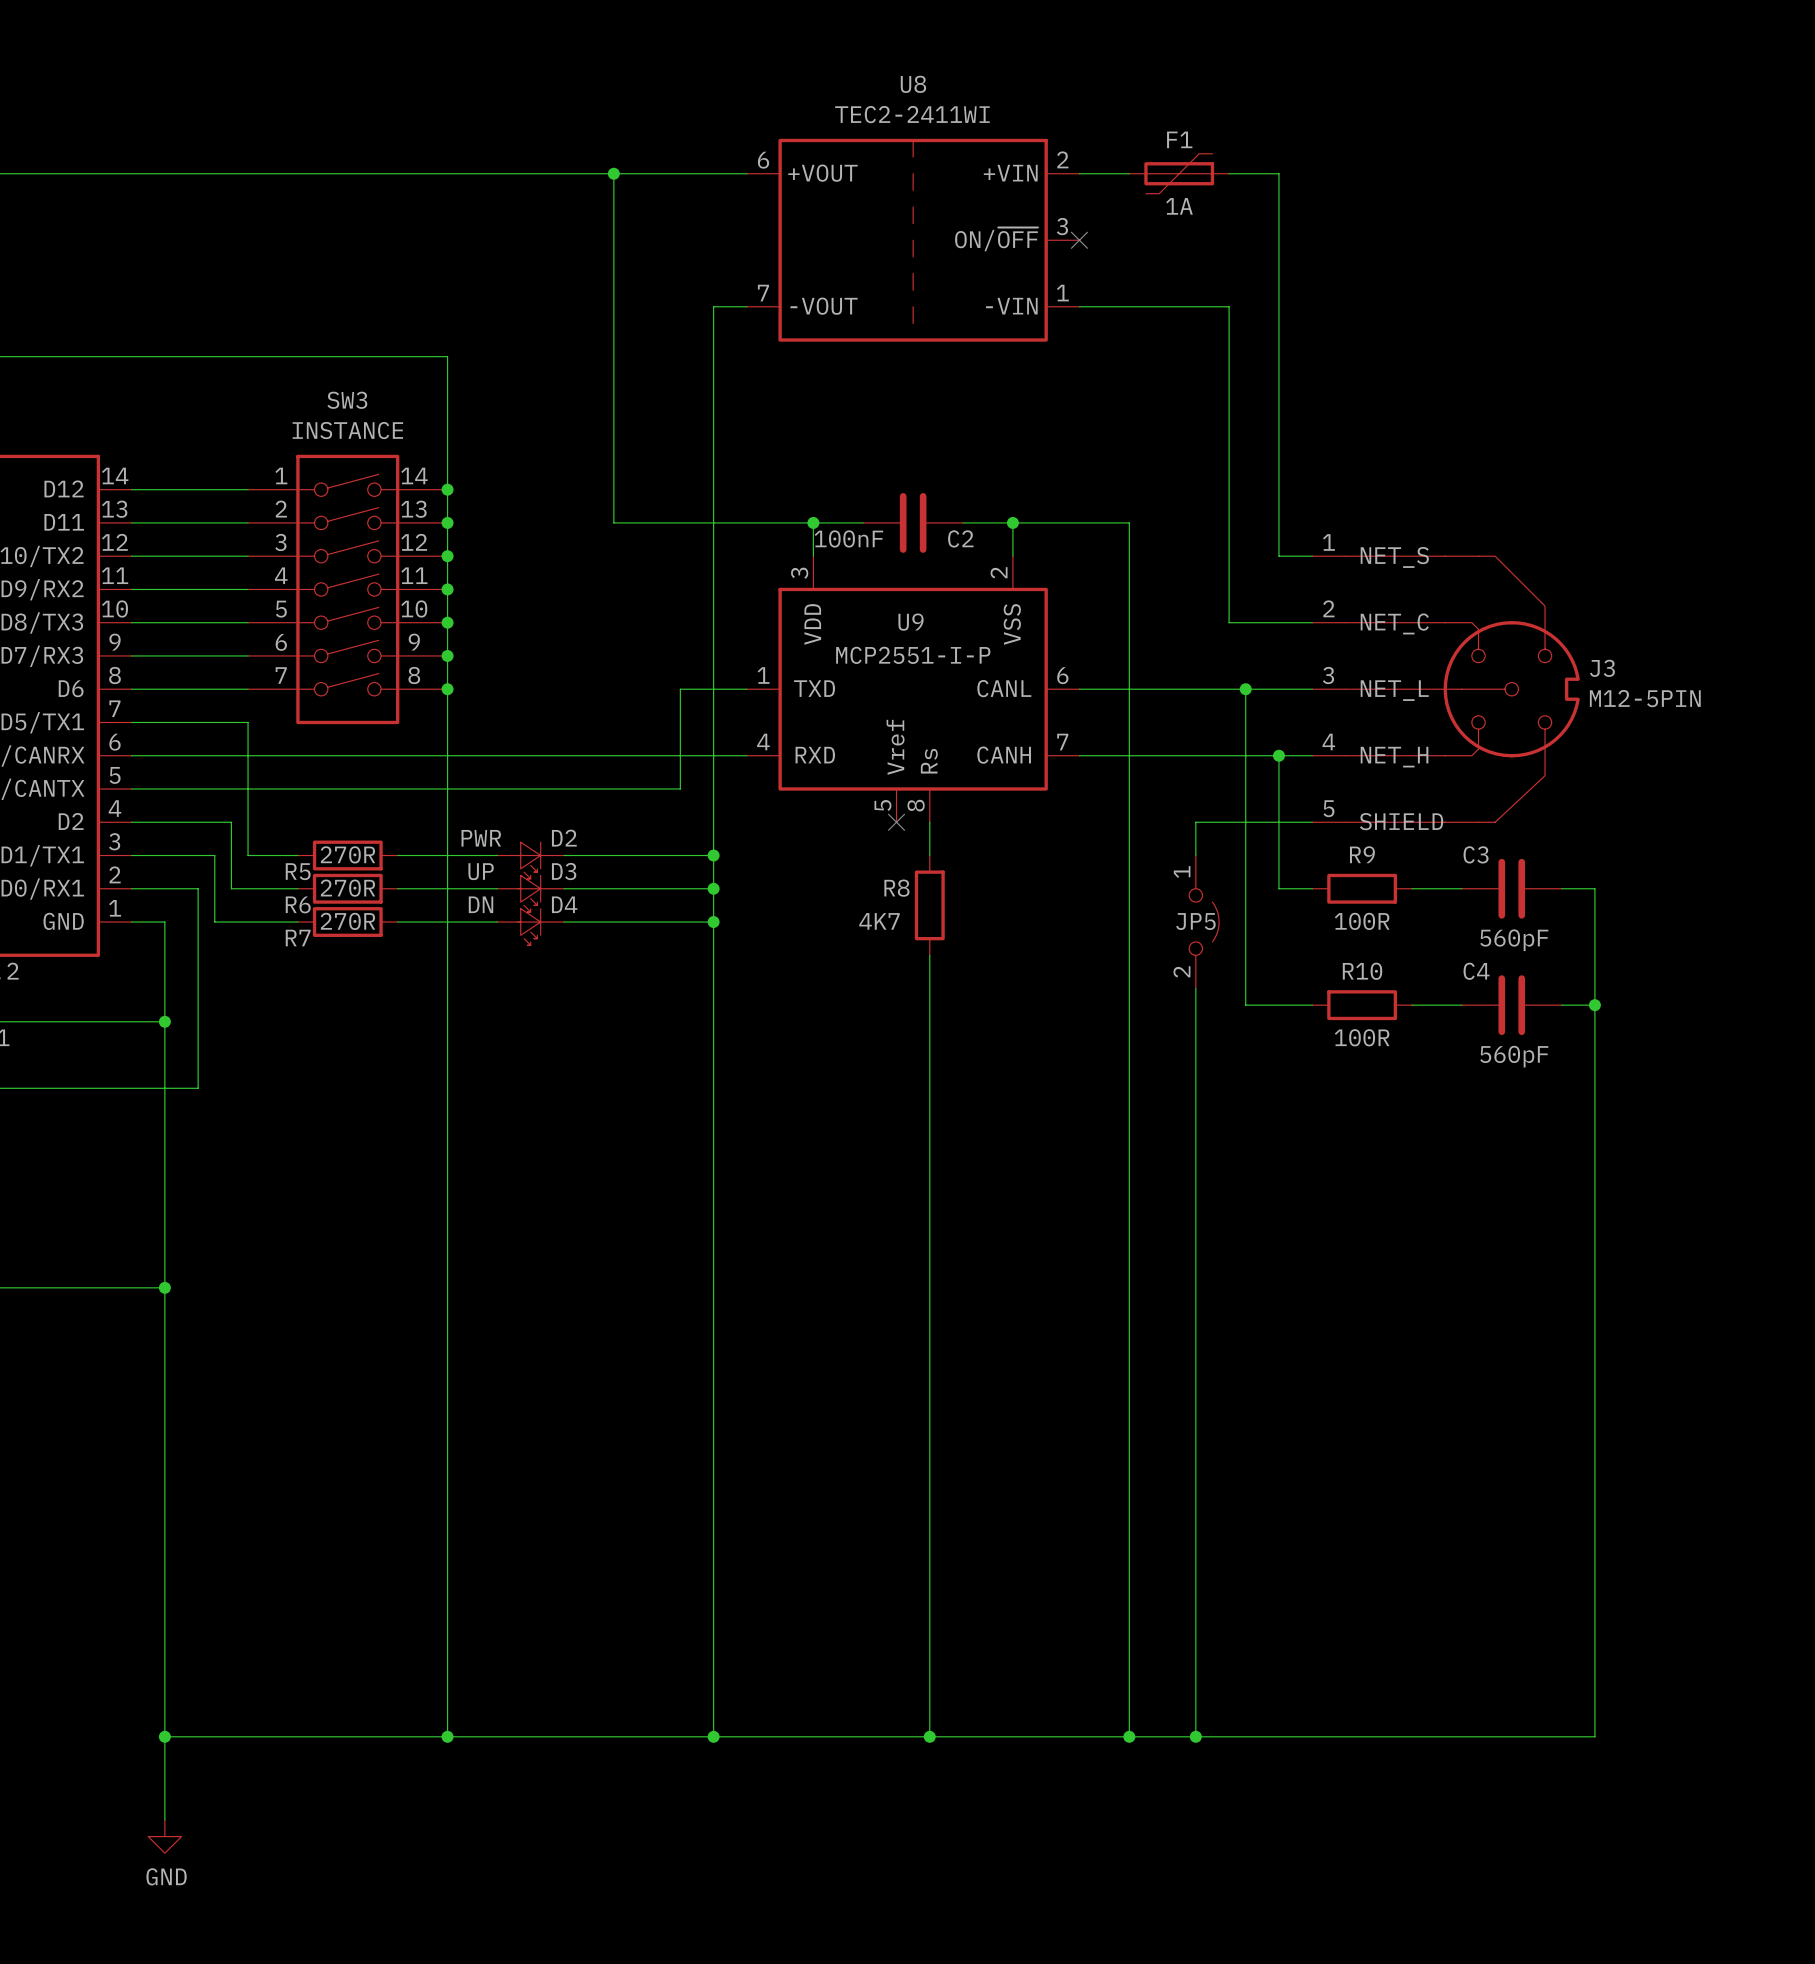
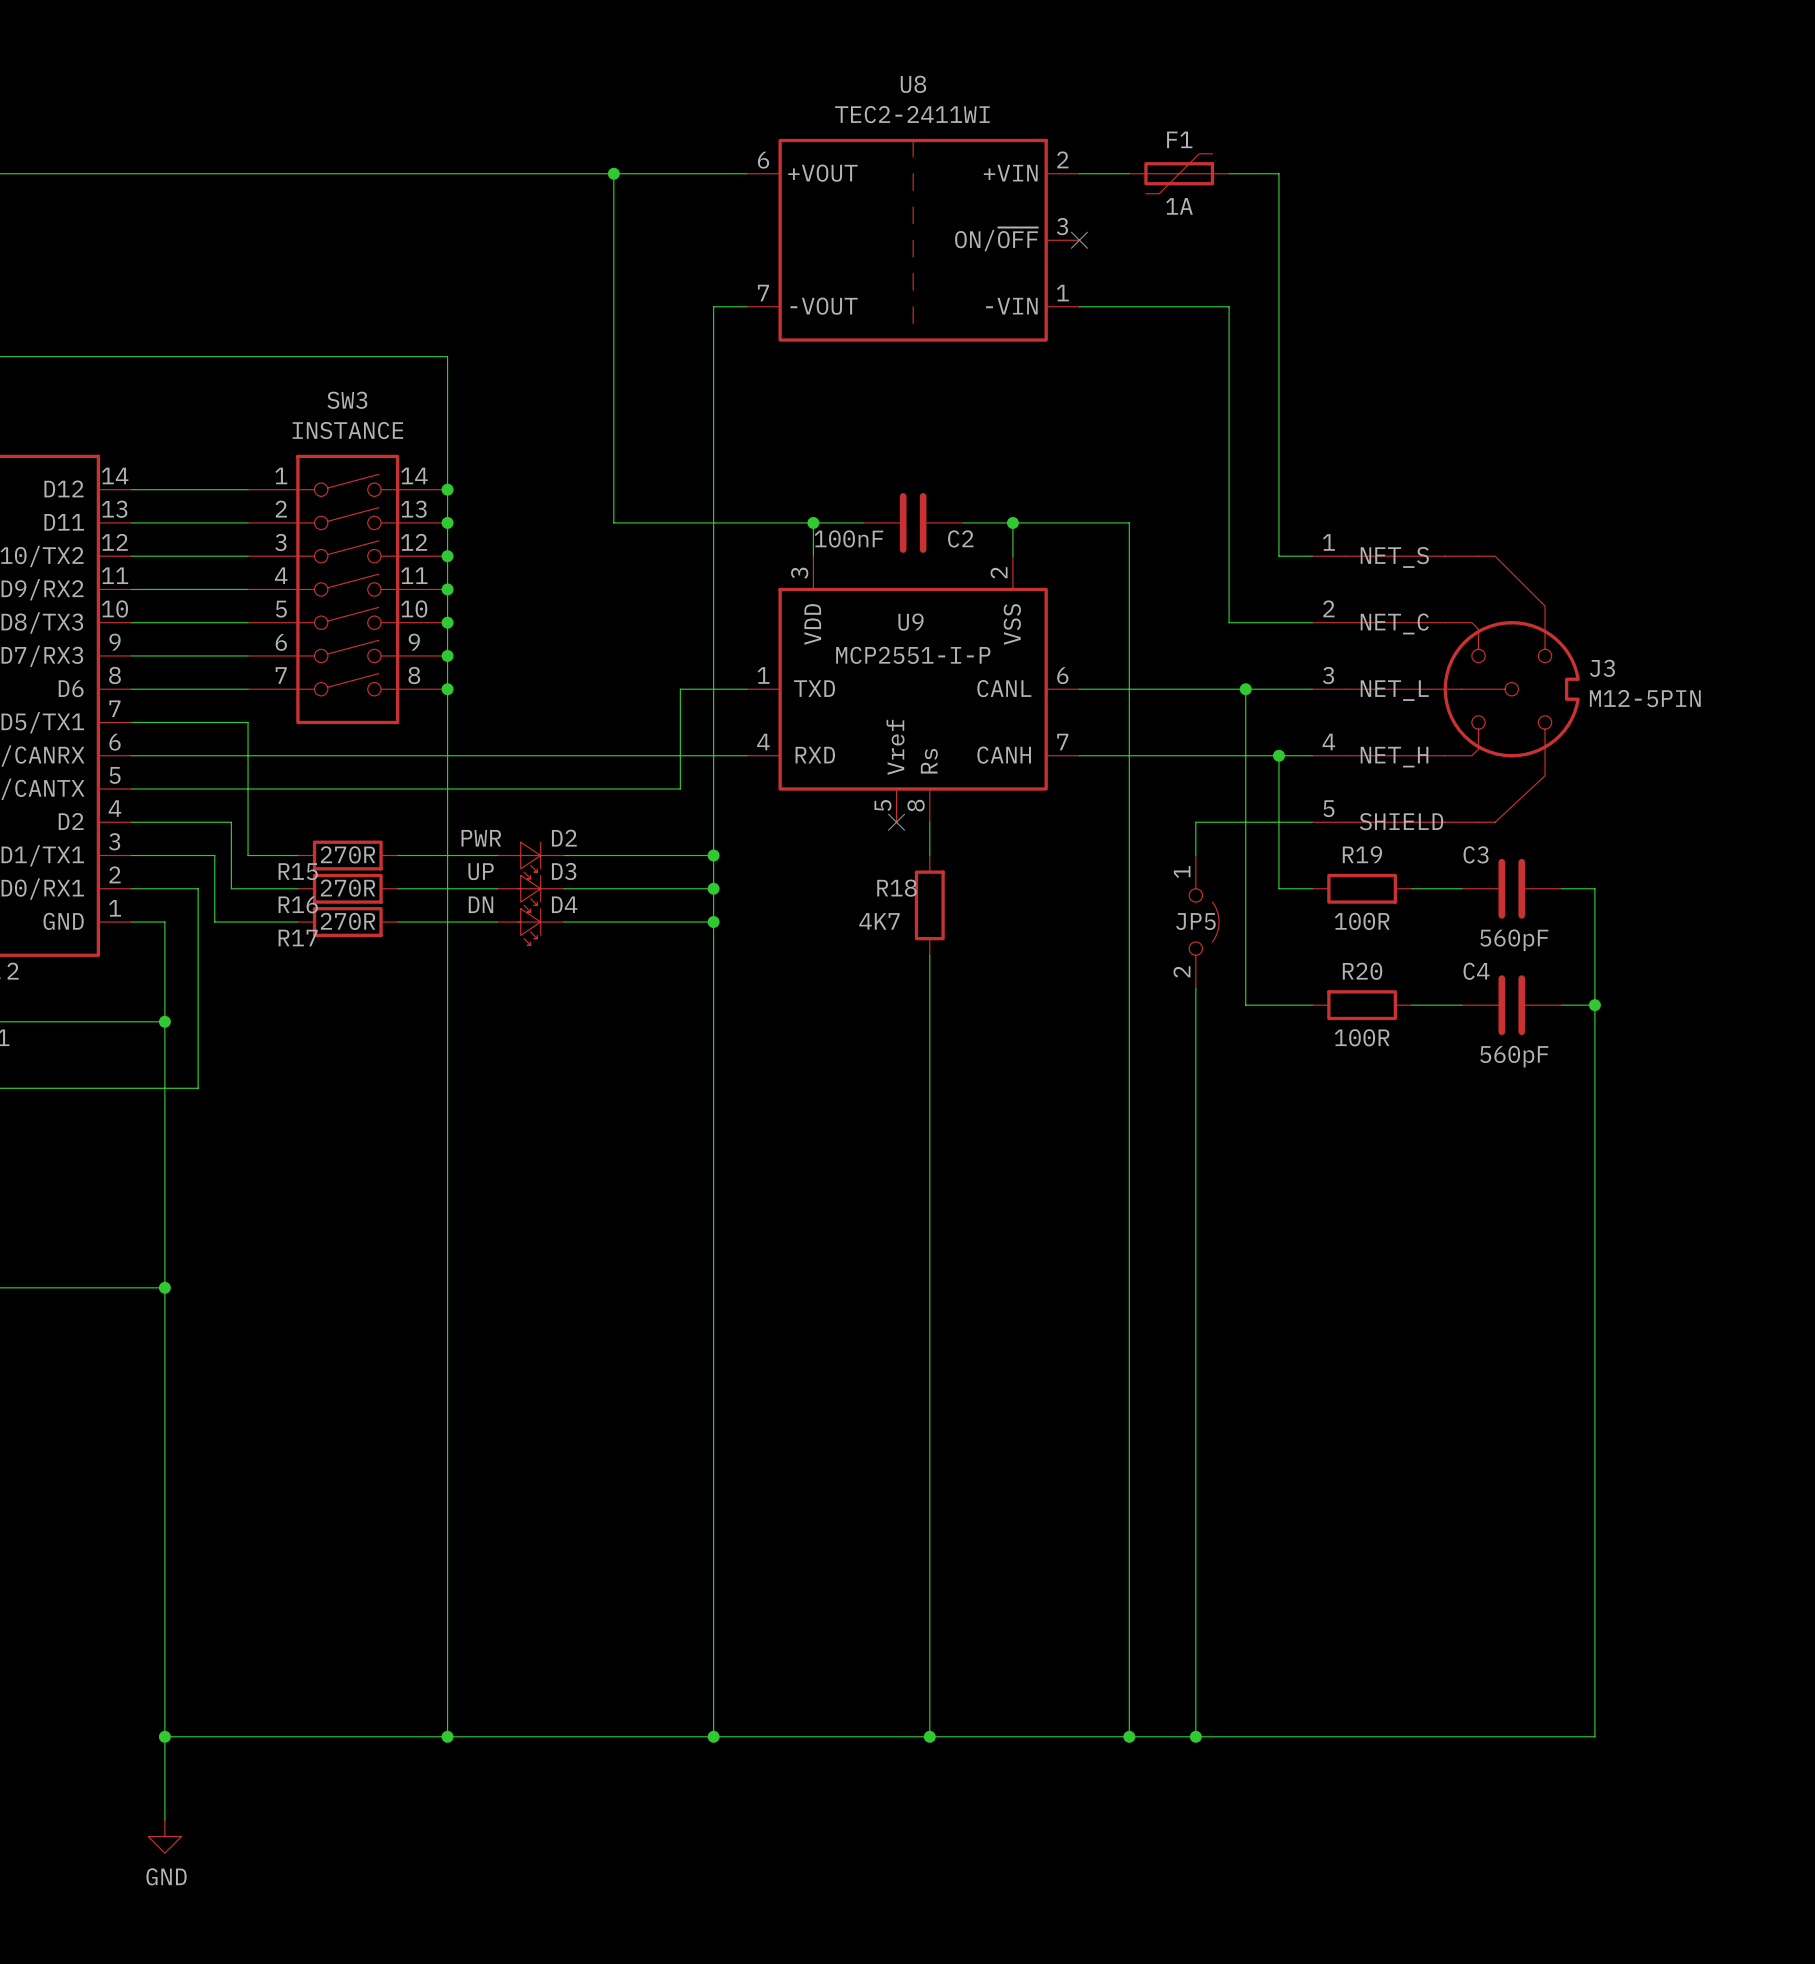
R9 name: R9 (1362, 854) -> R19 (1362, 854)
R5 name: R5 (298, 871) -> R15 (298, 871)
R8 name: R8 (896, 888) -> R18 (896, 888)
R6 name: R6 (298, 904) -> R16 (298, 904)
R7 name: R7 (298, 938) -> R17 (298, 938)
R10 name: R10 (1362, 971) -> R20 (1362, 971)

